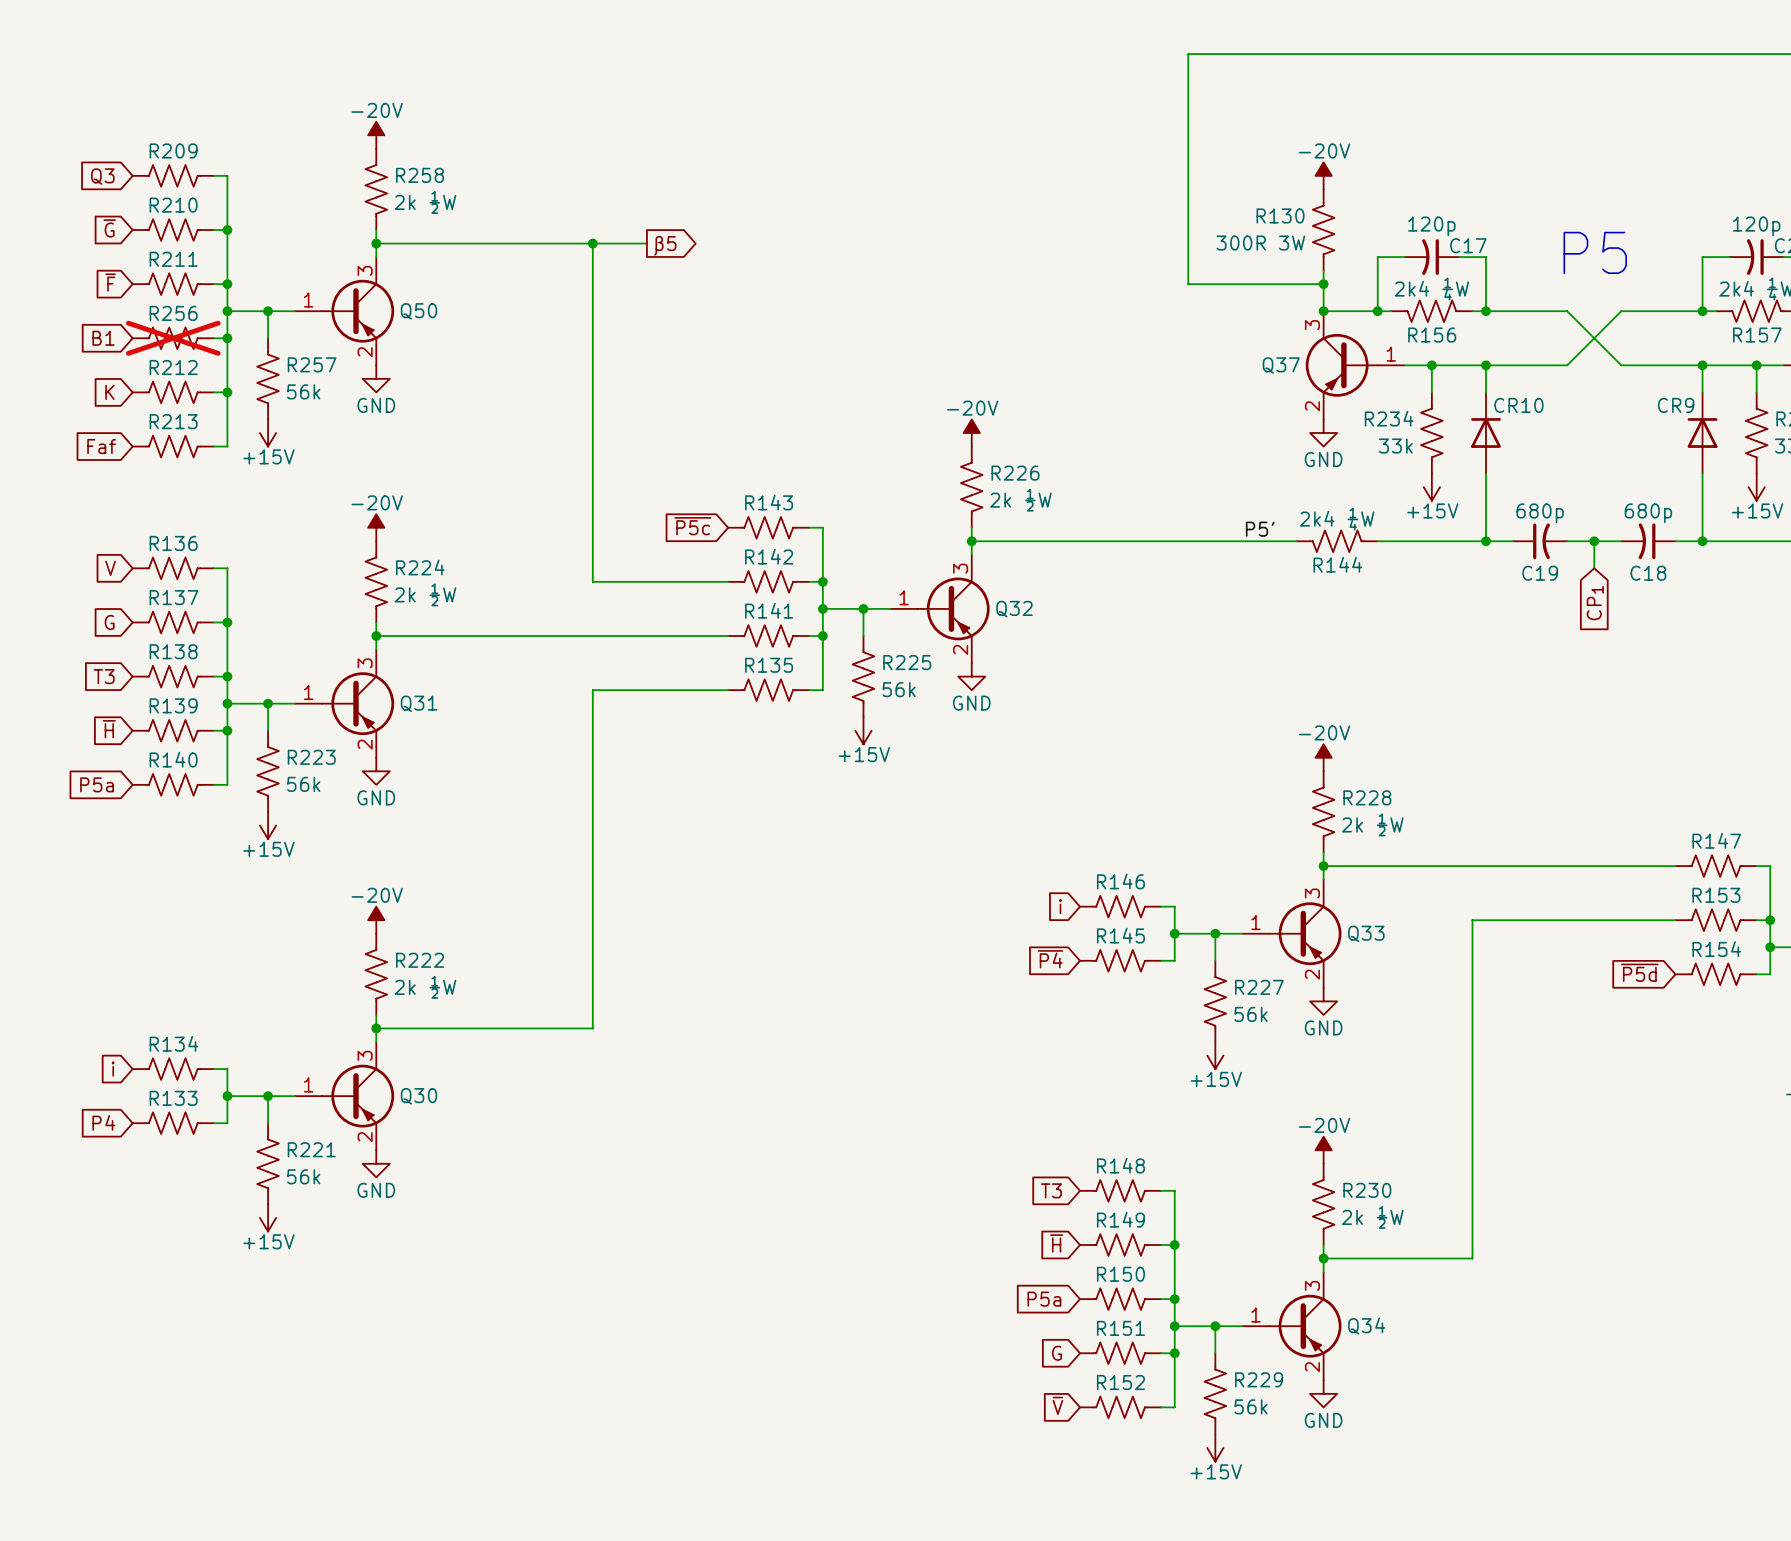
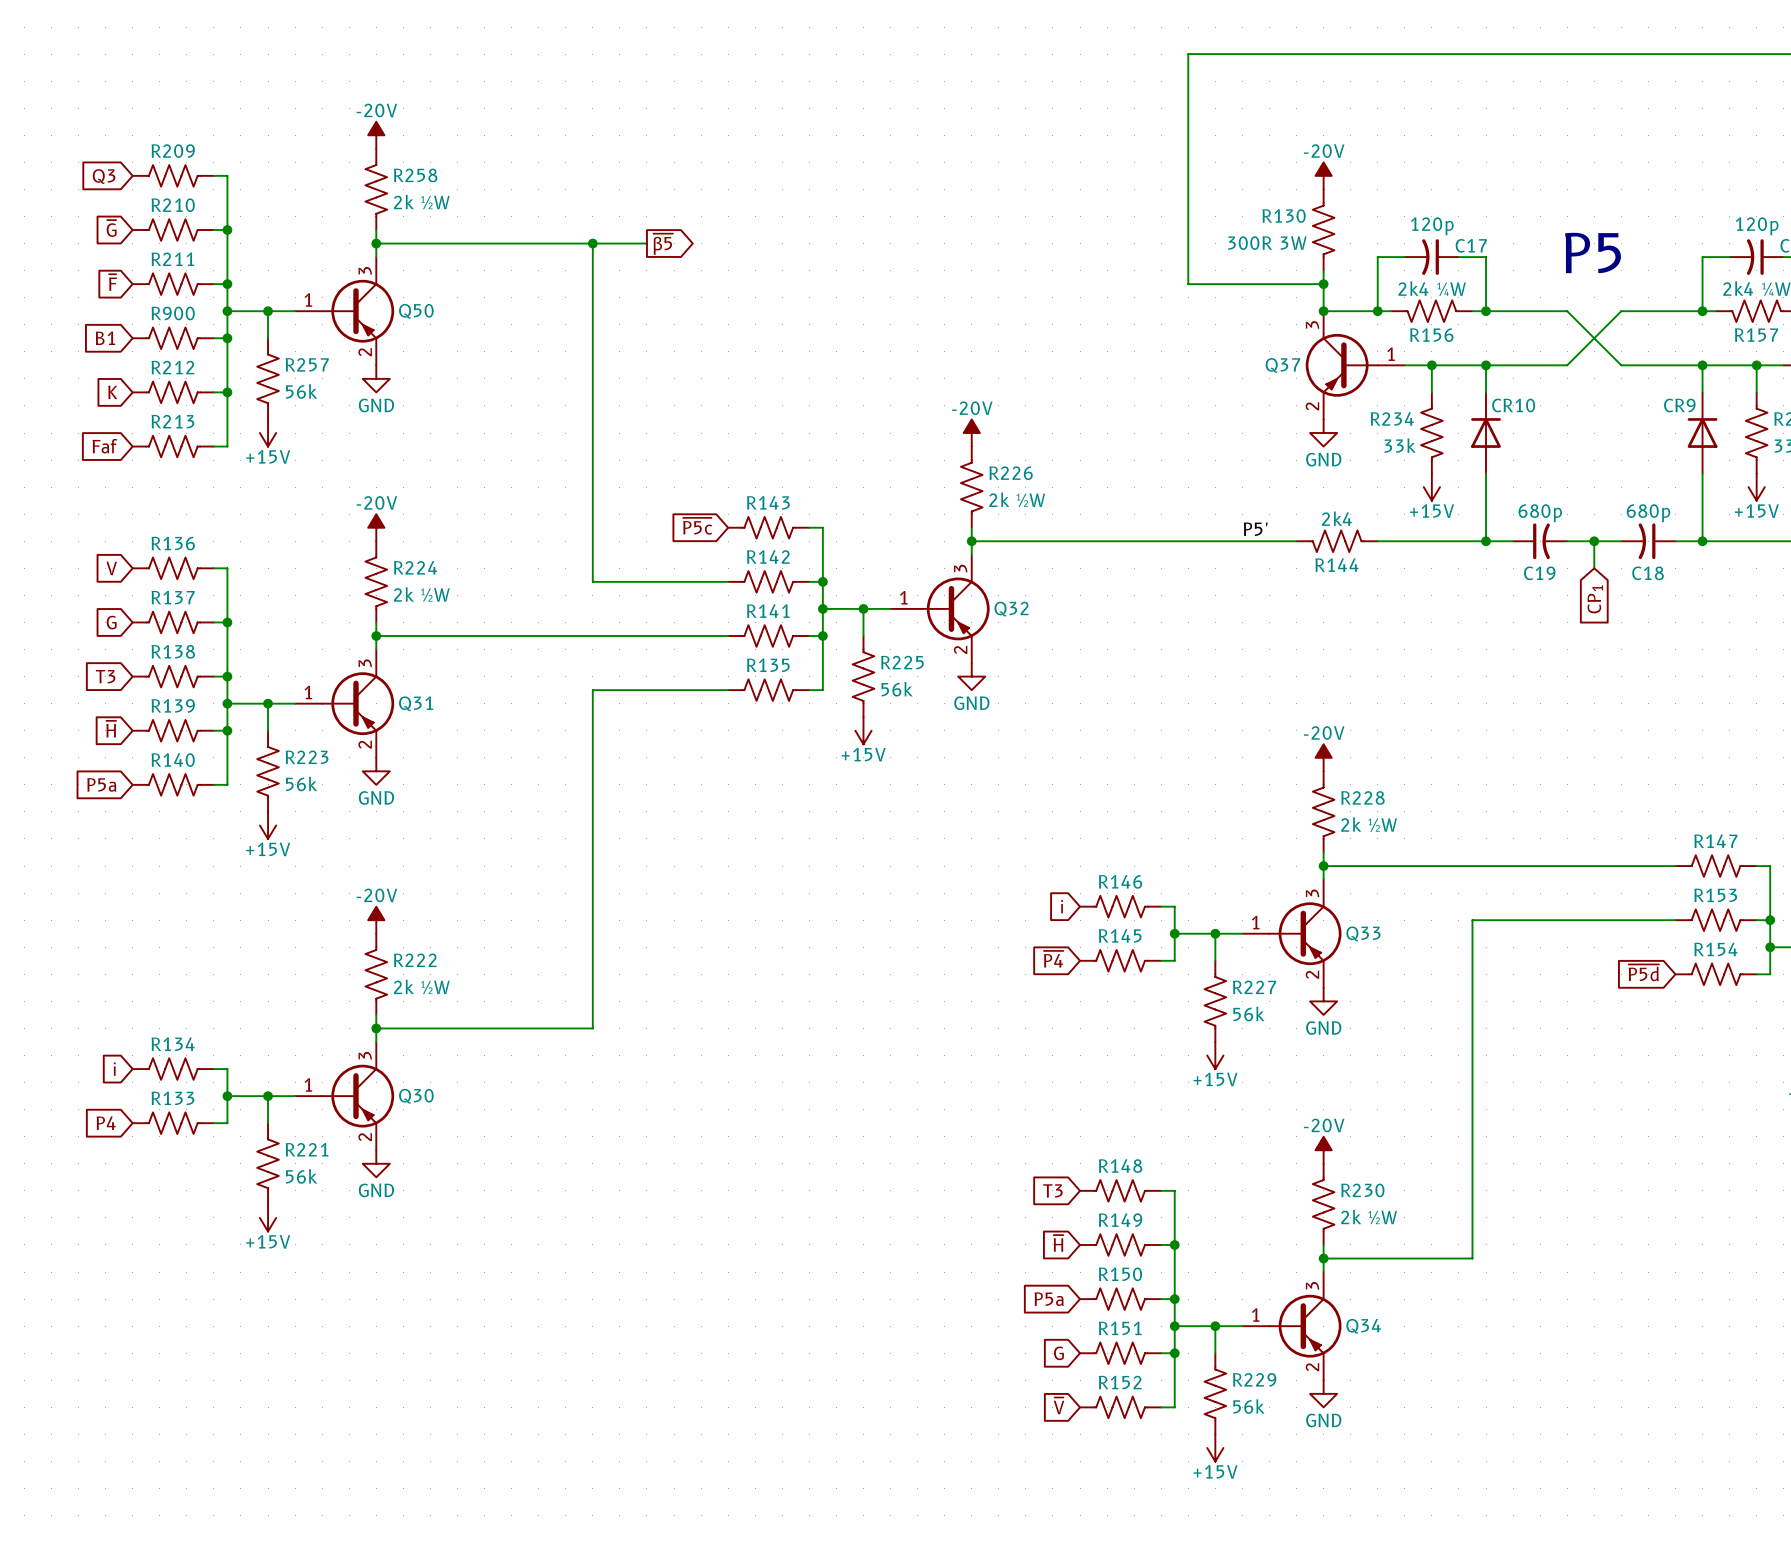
global label: β5 (665, 245) -> ~{β5} (663, 244)
R256 name: R256 (173, 313) -> R900 (173, 313)
R256 do-not-place cross: (173, 338) -> none
R144 value: 2k4 ¼W (1337, 519) -> 2k4 (1336, 518)

